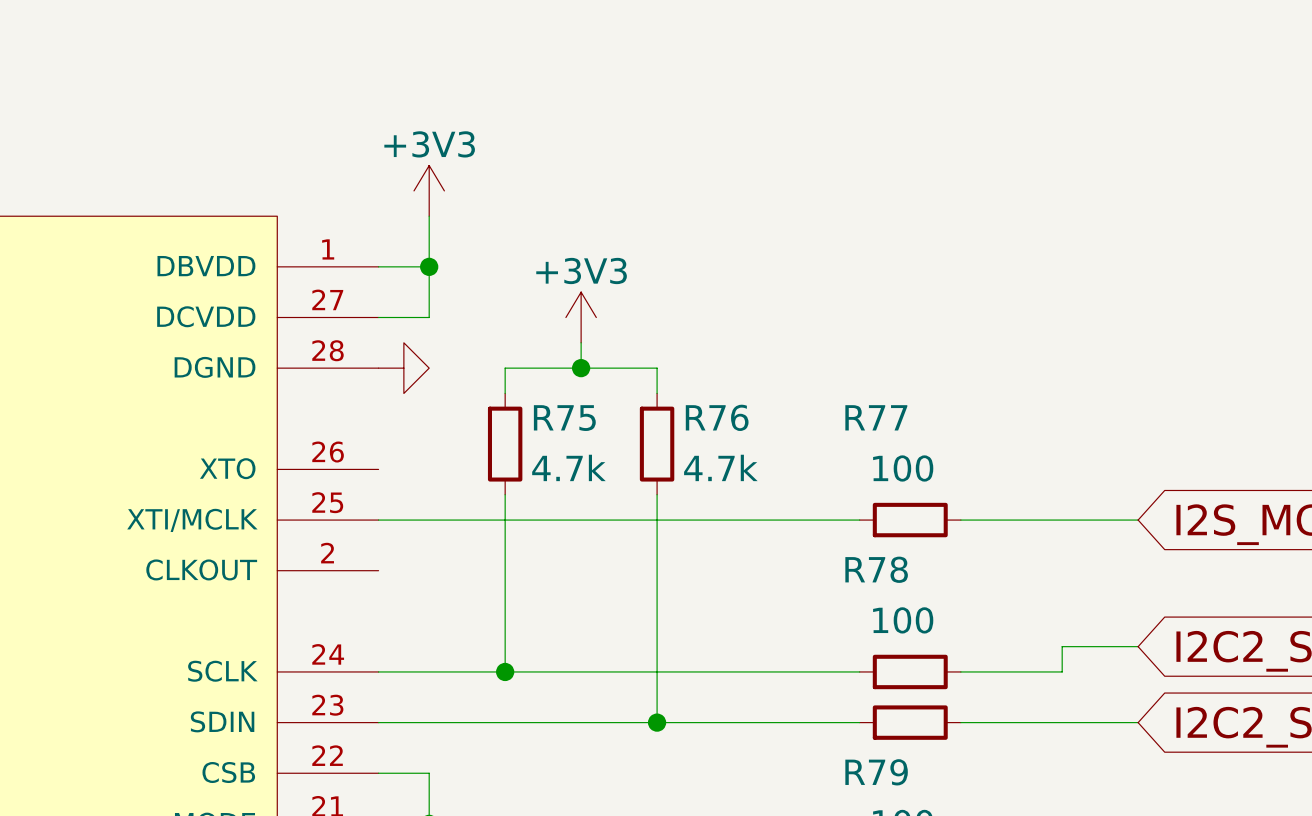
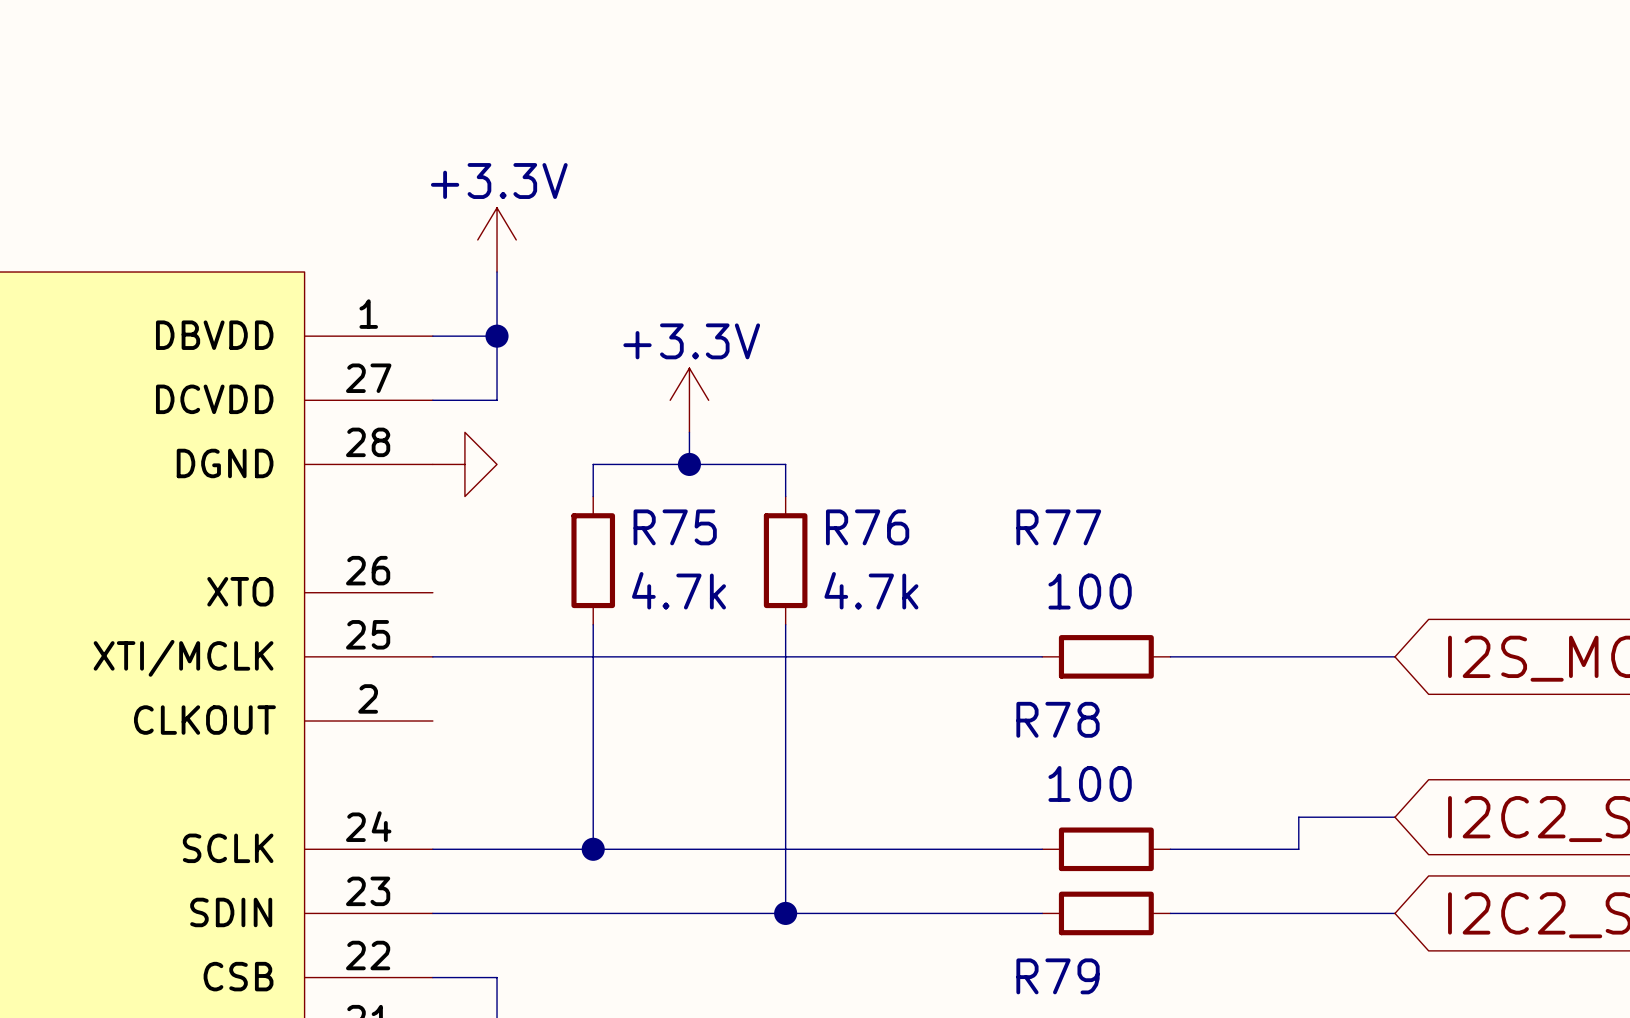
power symbol: +3V3 (429, 190) -> +3.3V (497, 239)
power symbol: +3V3 (581, 317) -> +3.3V (689, 400)

